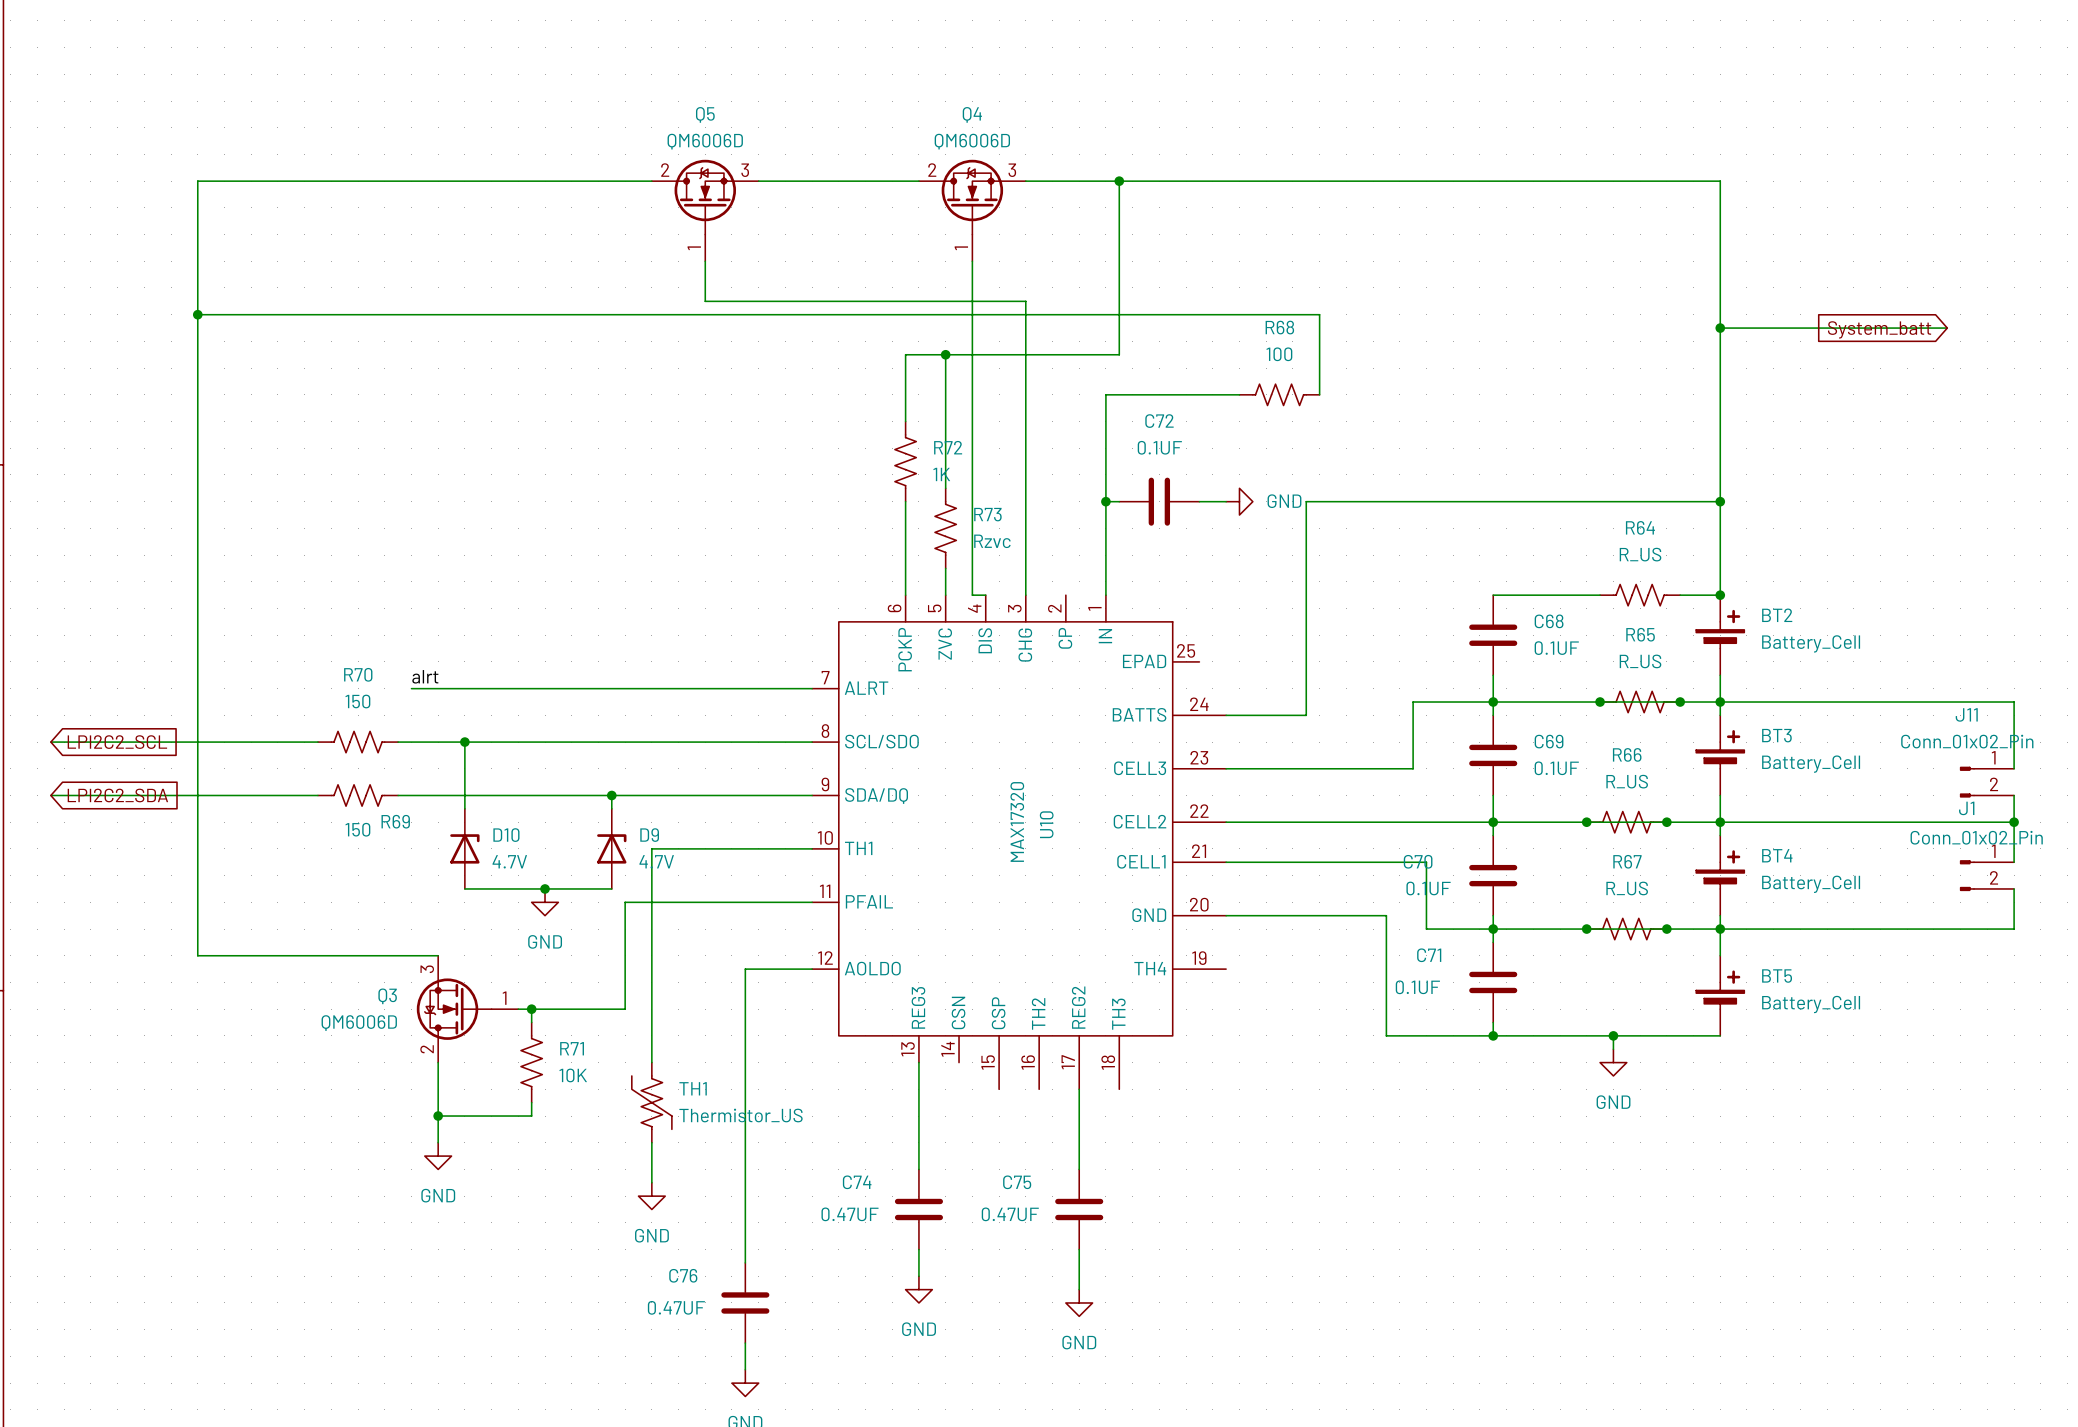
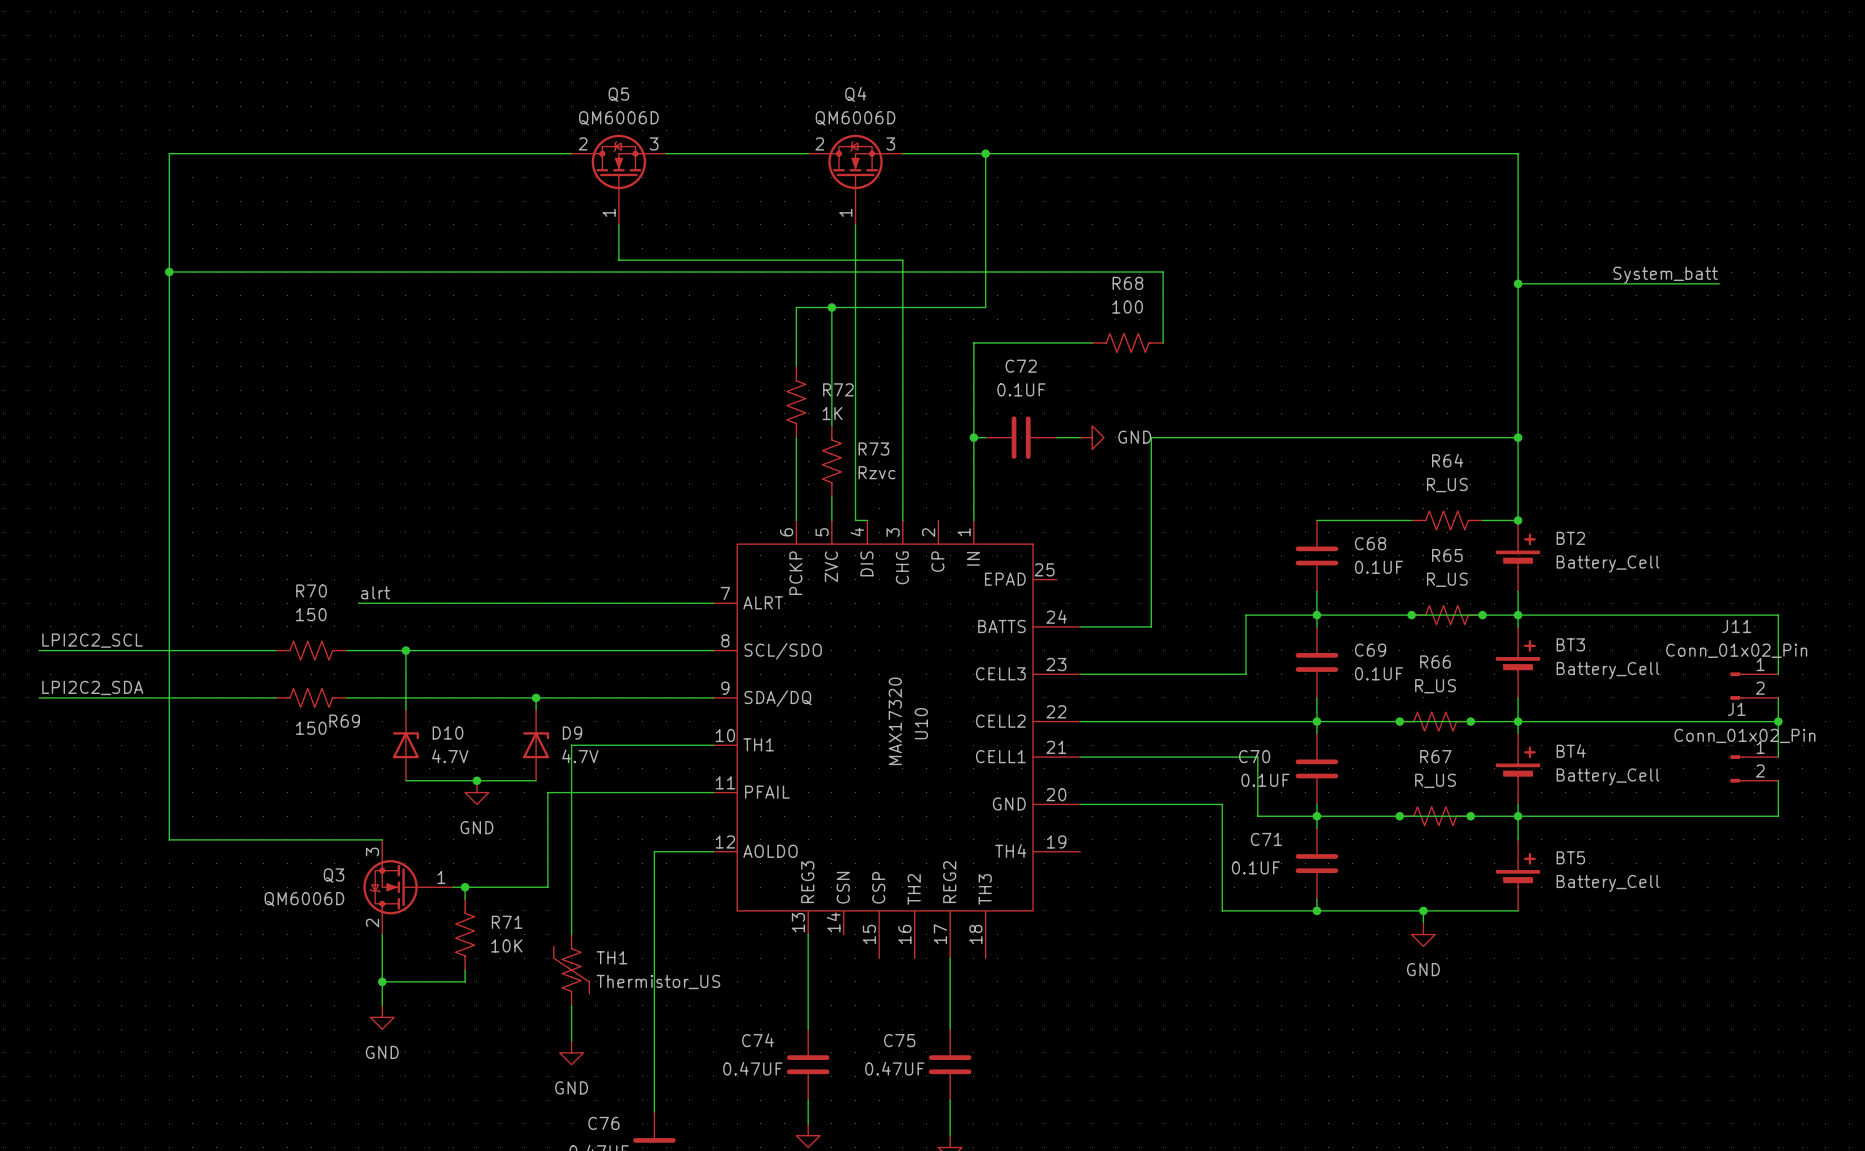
label: none -> System_batt (1665, 275)
global label: System_batt (1879, 329) -> none
label: none -> LPI2C2_SCL (92, 640)
global label: LPI2C2_SCL (117, 742) -> none
label: none -> LPI2C2_SDA (92, 687)
global label: LPI2C2_SDA (117, 795) -> none

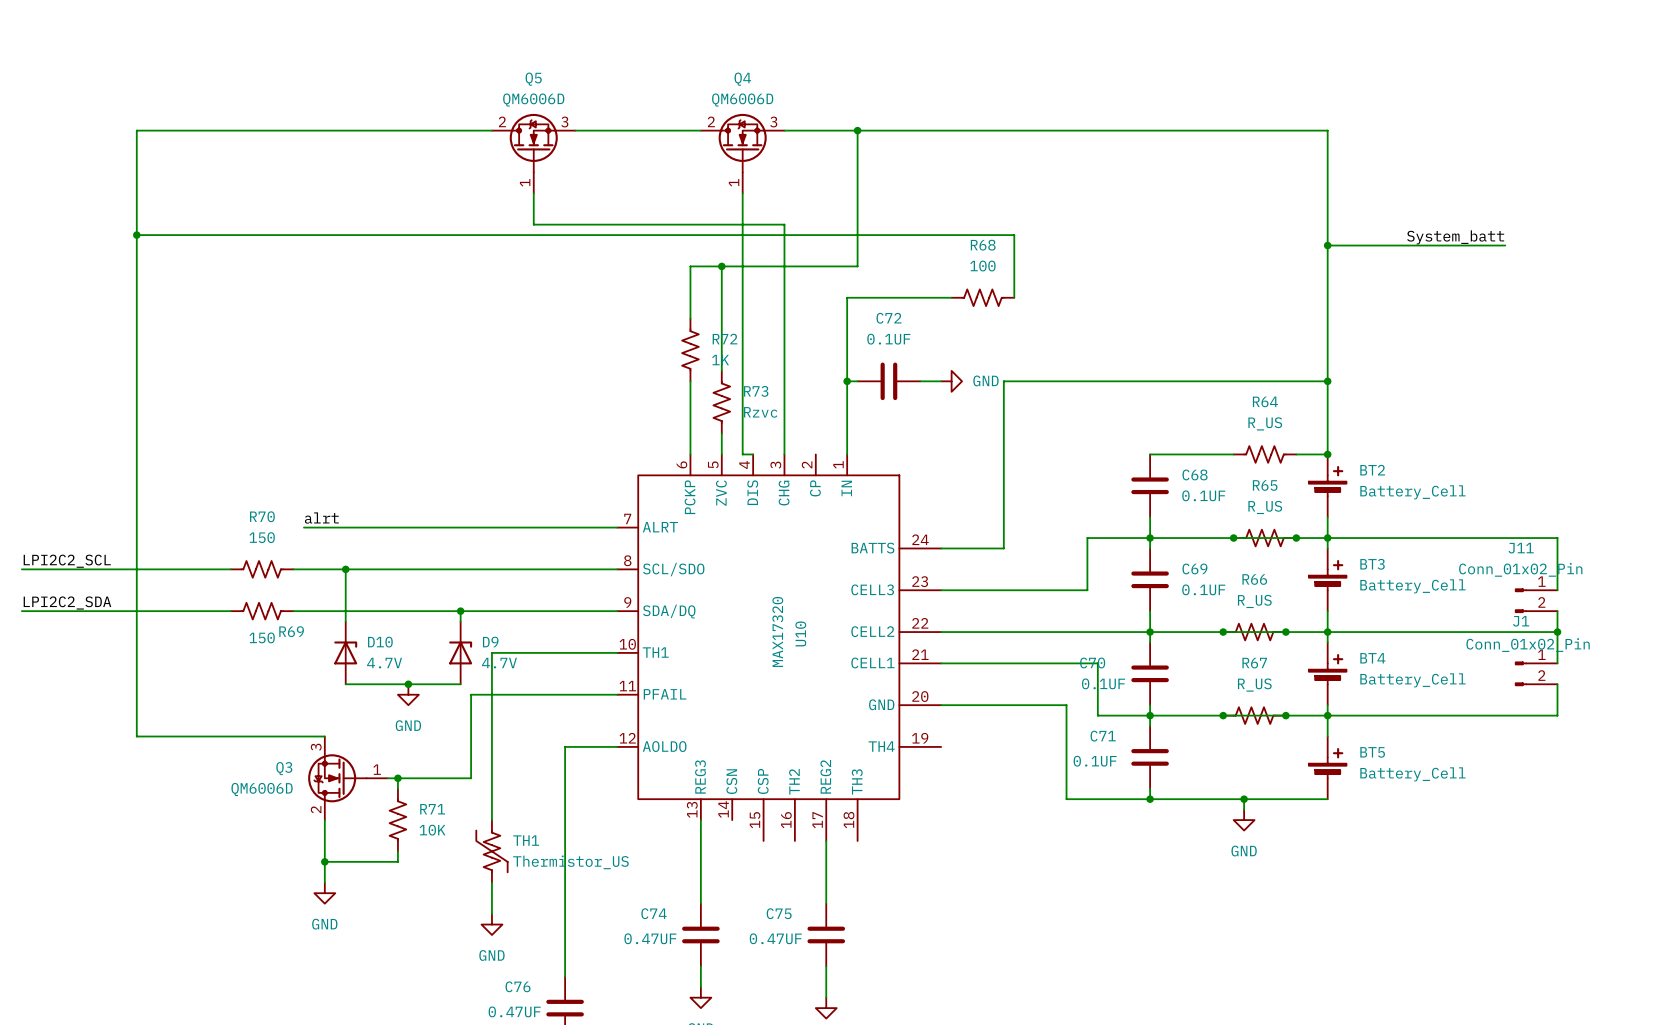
U10 symbol: [713, 520, 1081, 959] -> [617, 454, 942, 841]

